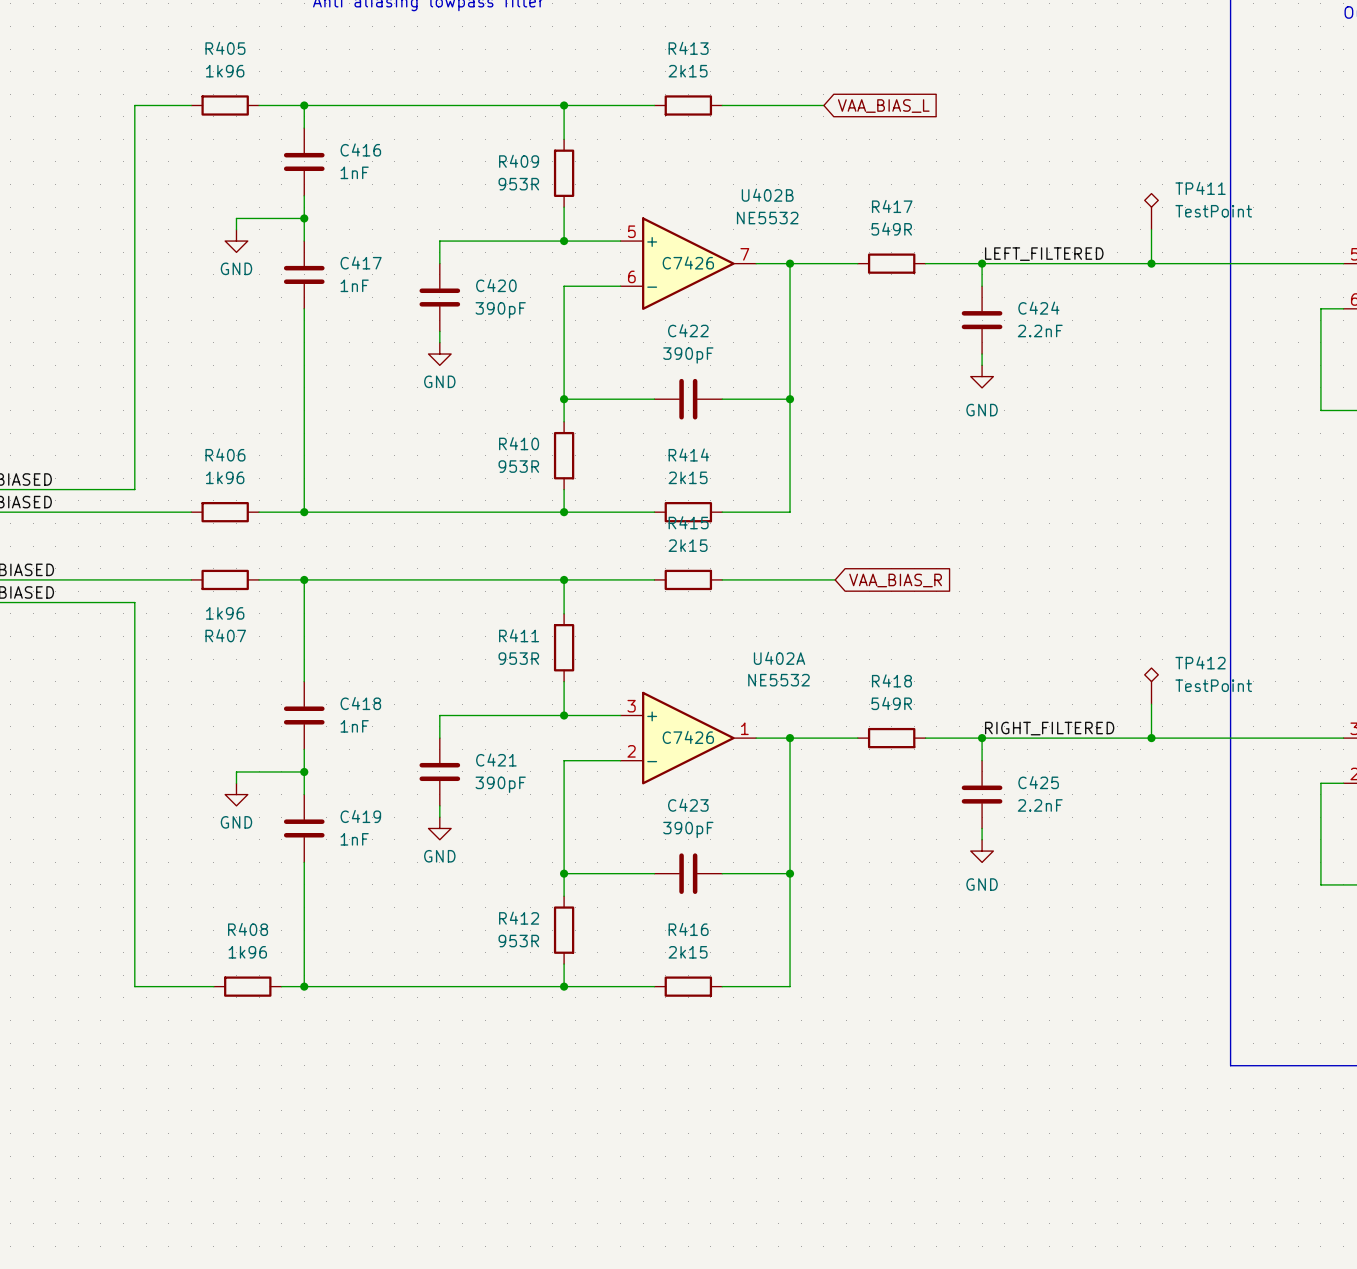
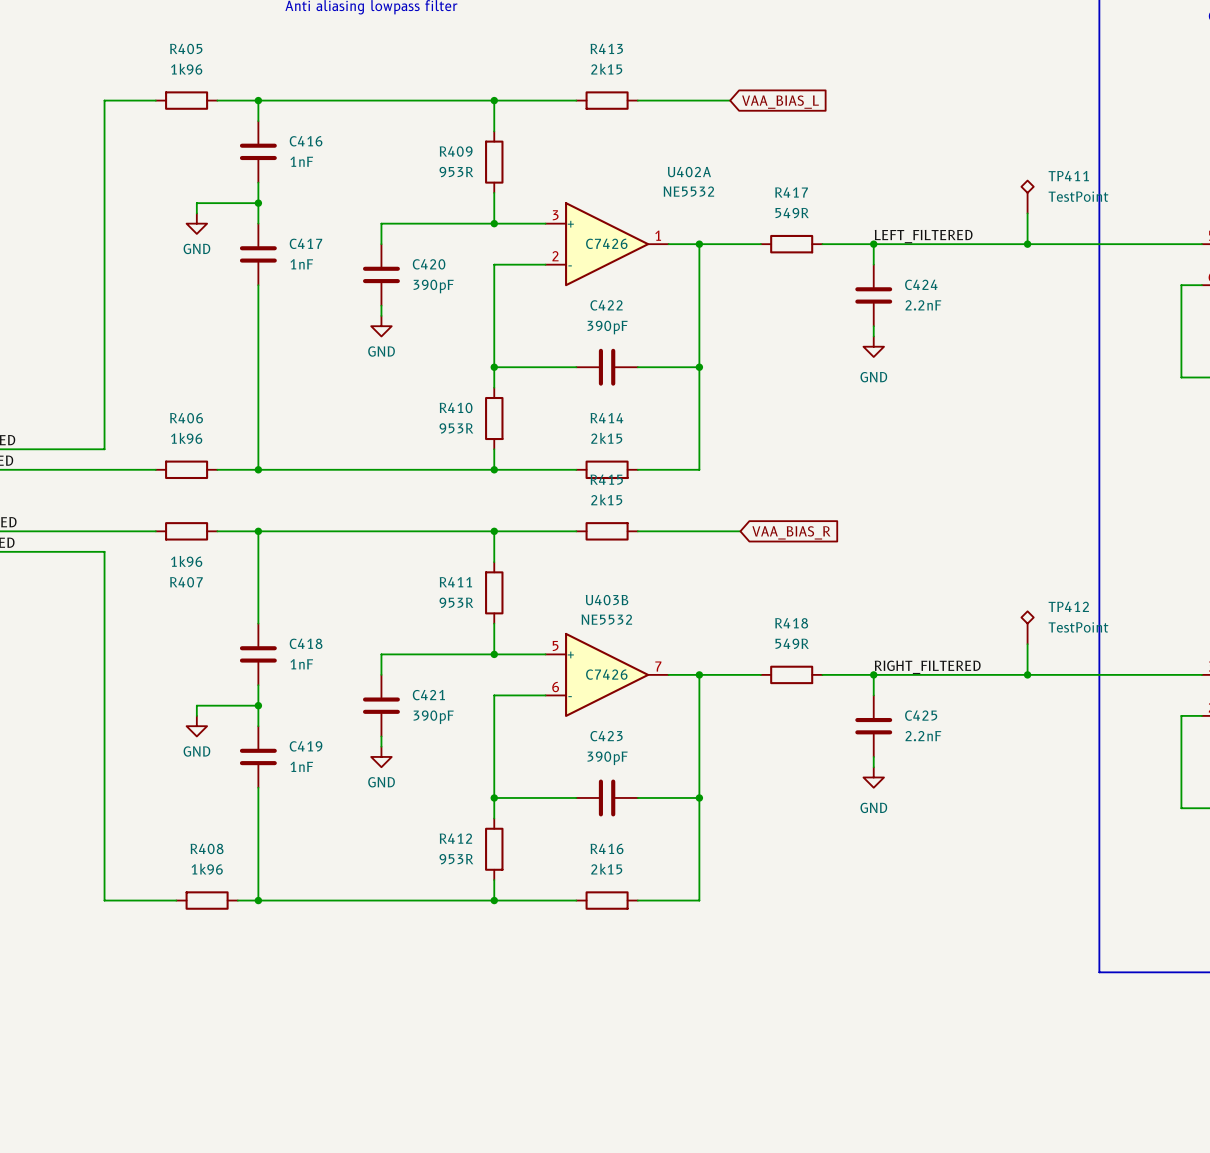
U402B: NE5532 (688, 263) -> none
U402A position: (688, 738) -> (607, 244)
U403B: none -> NE5532 (607, 674)

